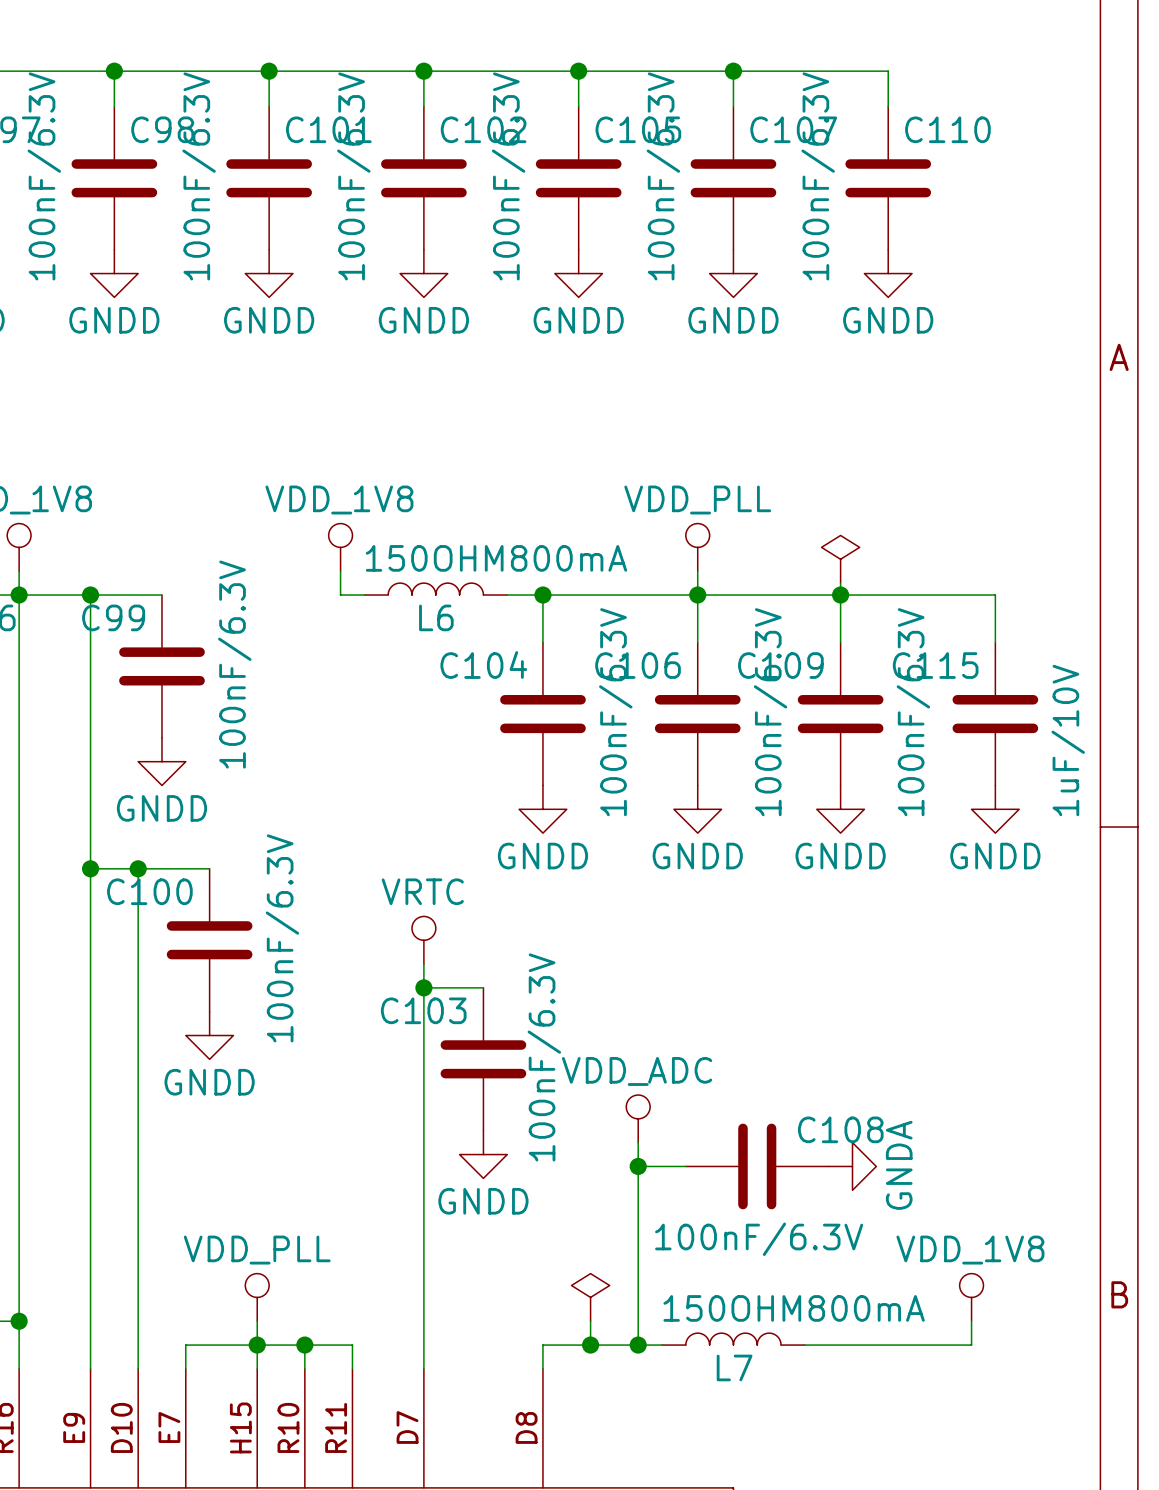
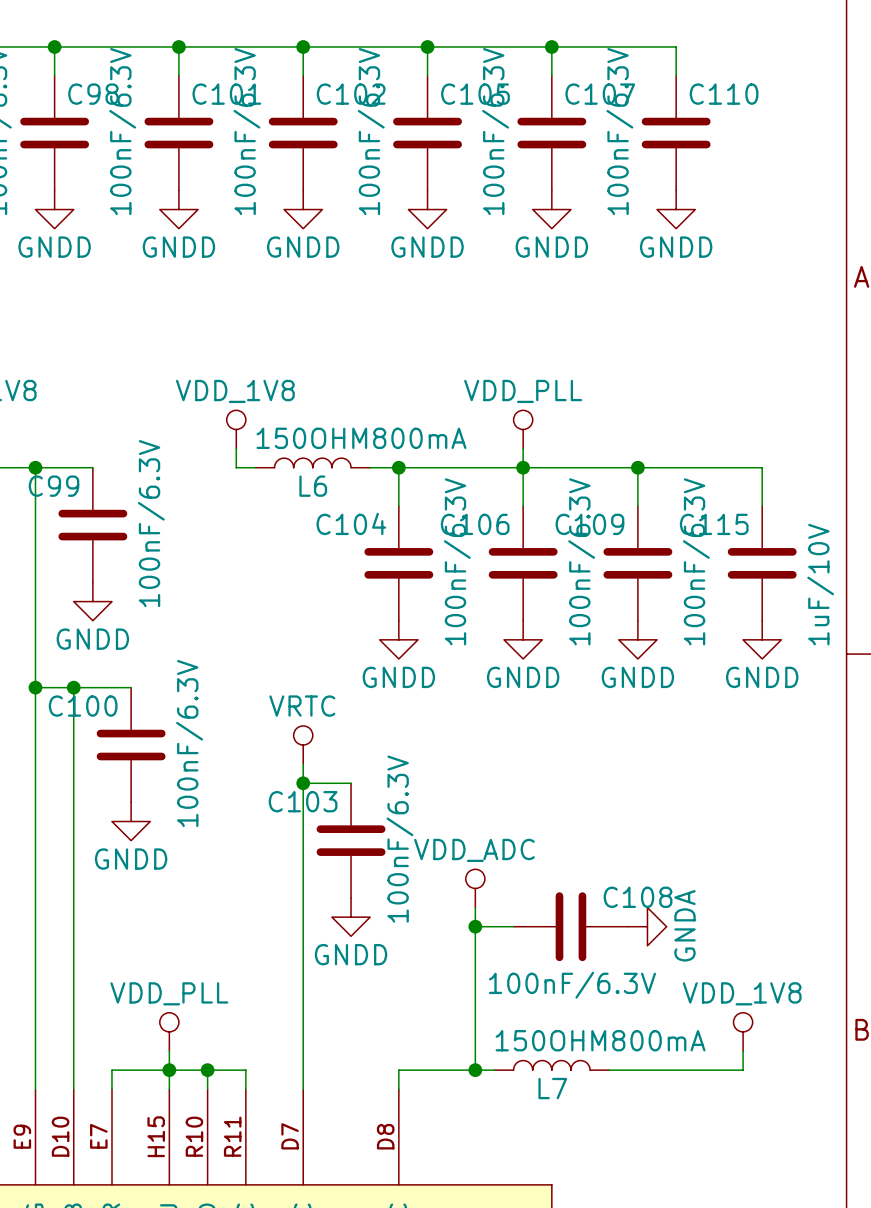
power symbol: (840, 559) -> none
power symbol: (590, 1297) -> none
wire: (590, 1321) (590, 1345) -> none
junction: (590, 1345) -> none

